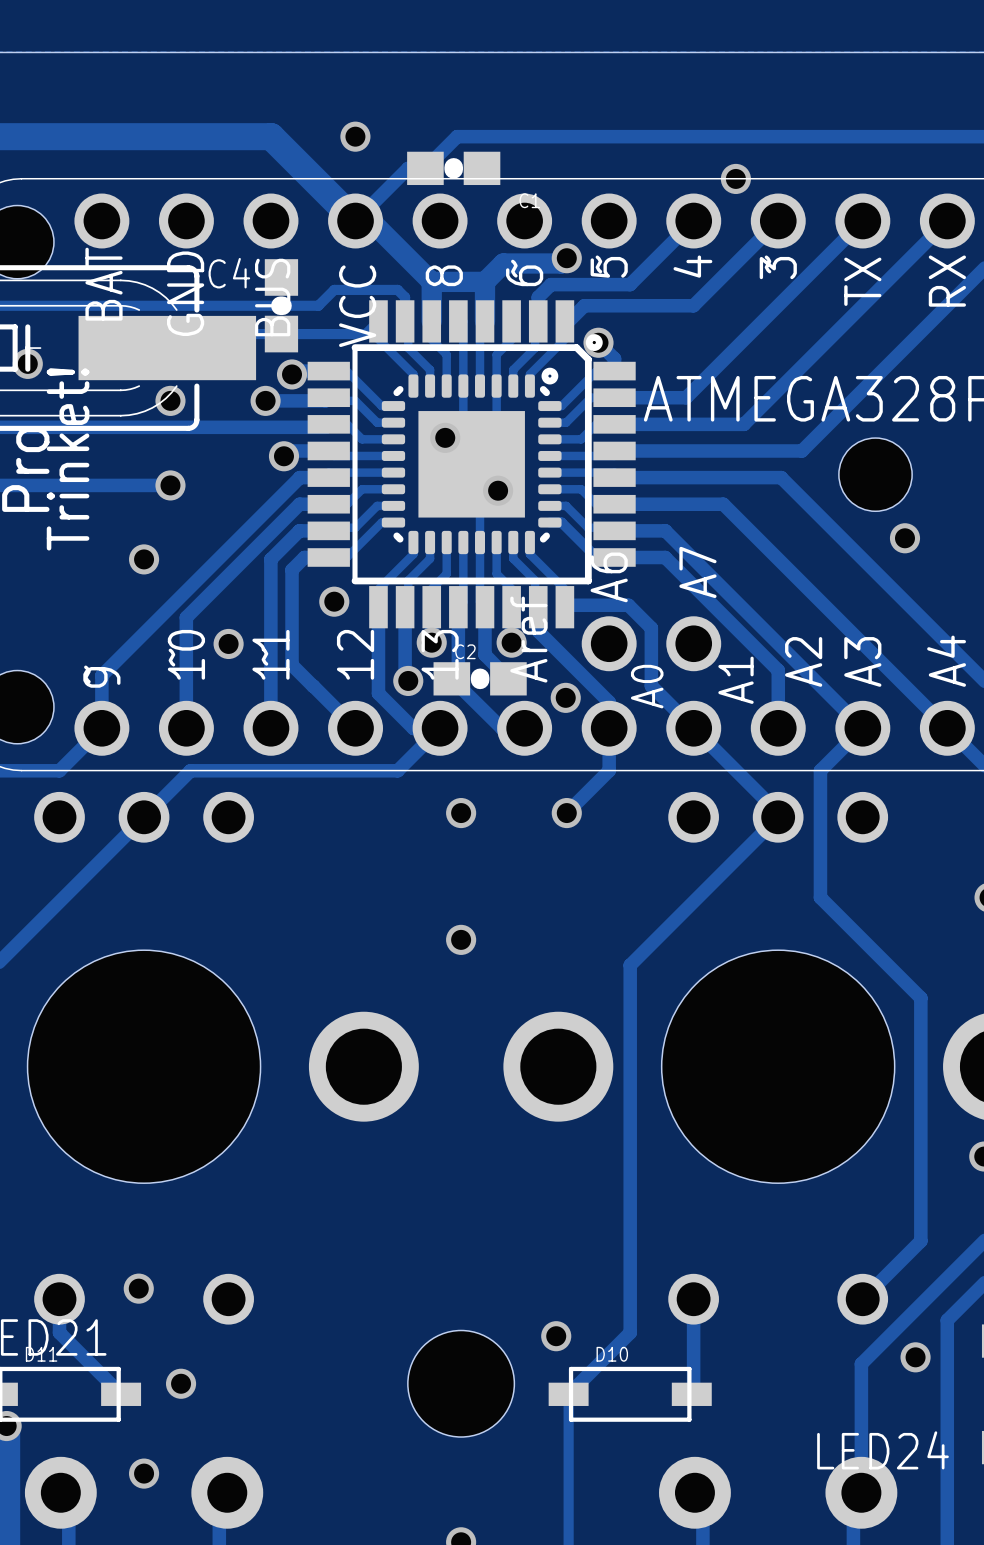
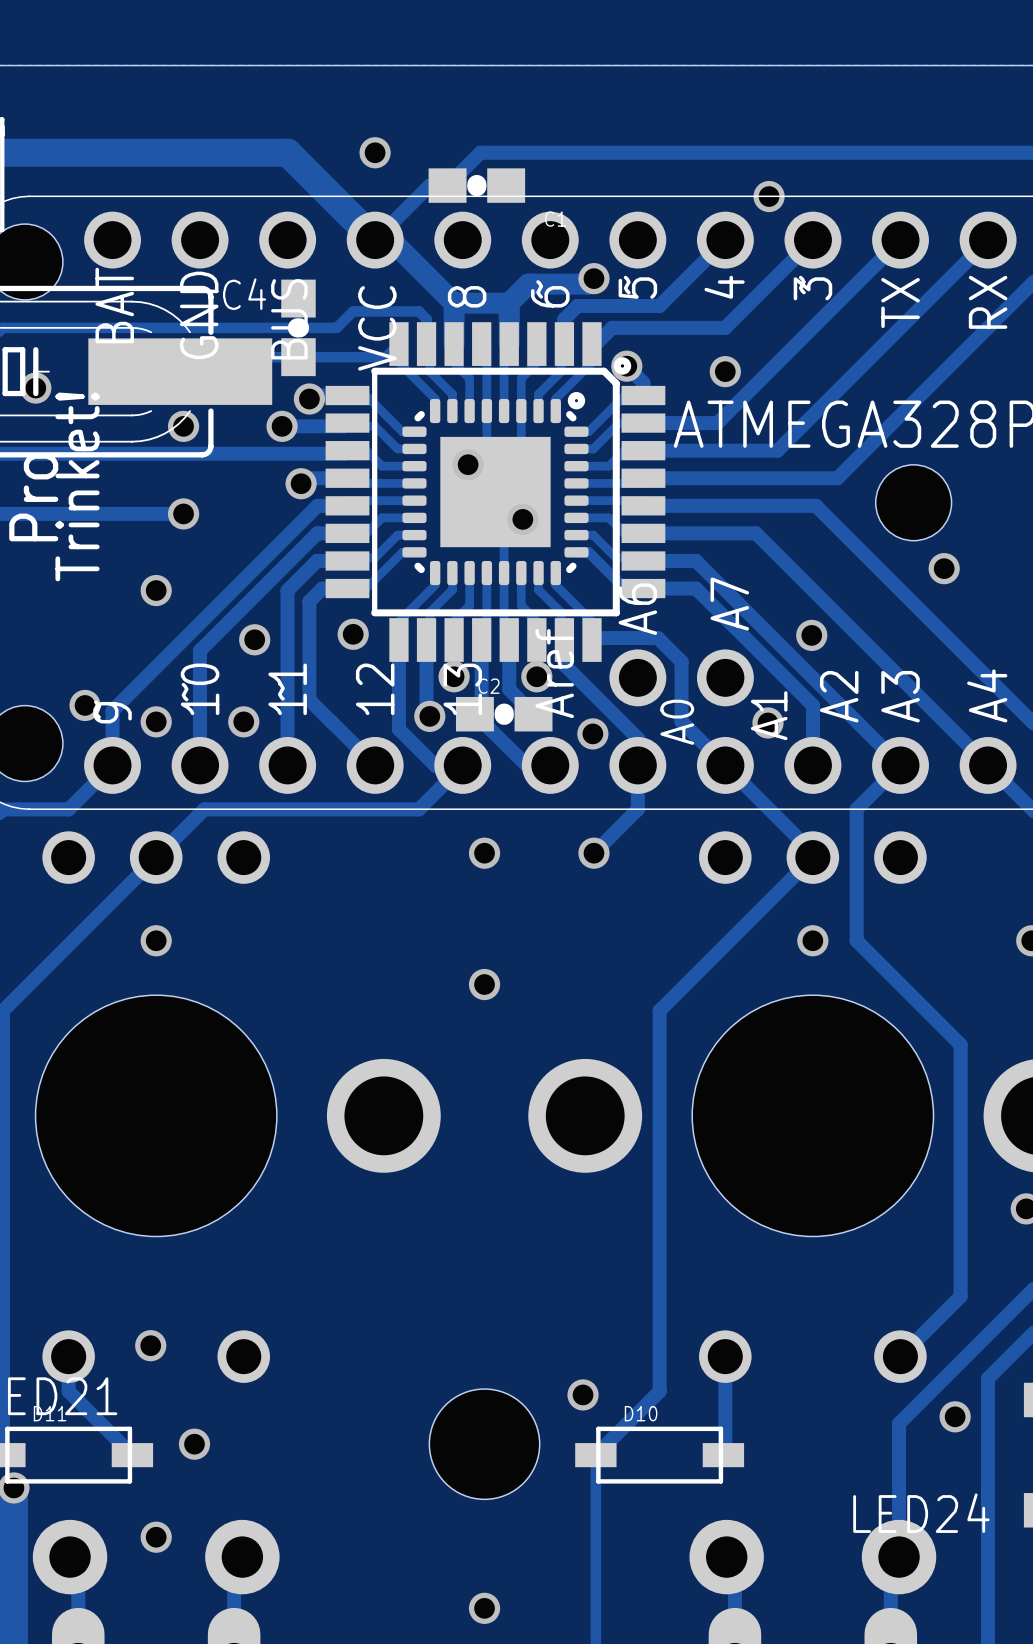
via: none -> (725, 371)
via: none -> (811, 635)
via: none -> (254, 639)
via: (228, 643) -> none
via: none -> (85, 705)
via: none -> (156, 721)
via: none -> (243, 721)
via: none -> (767, 722)
via: none -> (156, 940)
via: none -> (812, 940)

